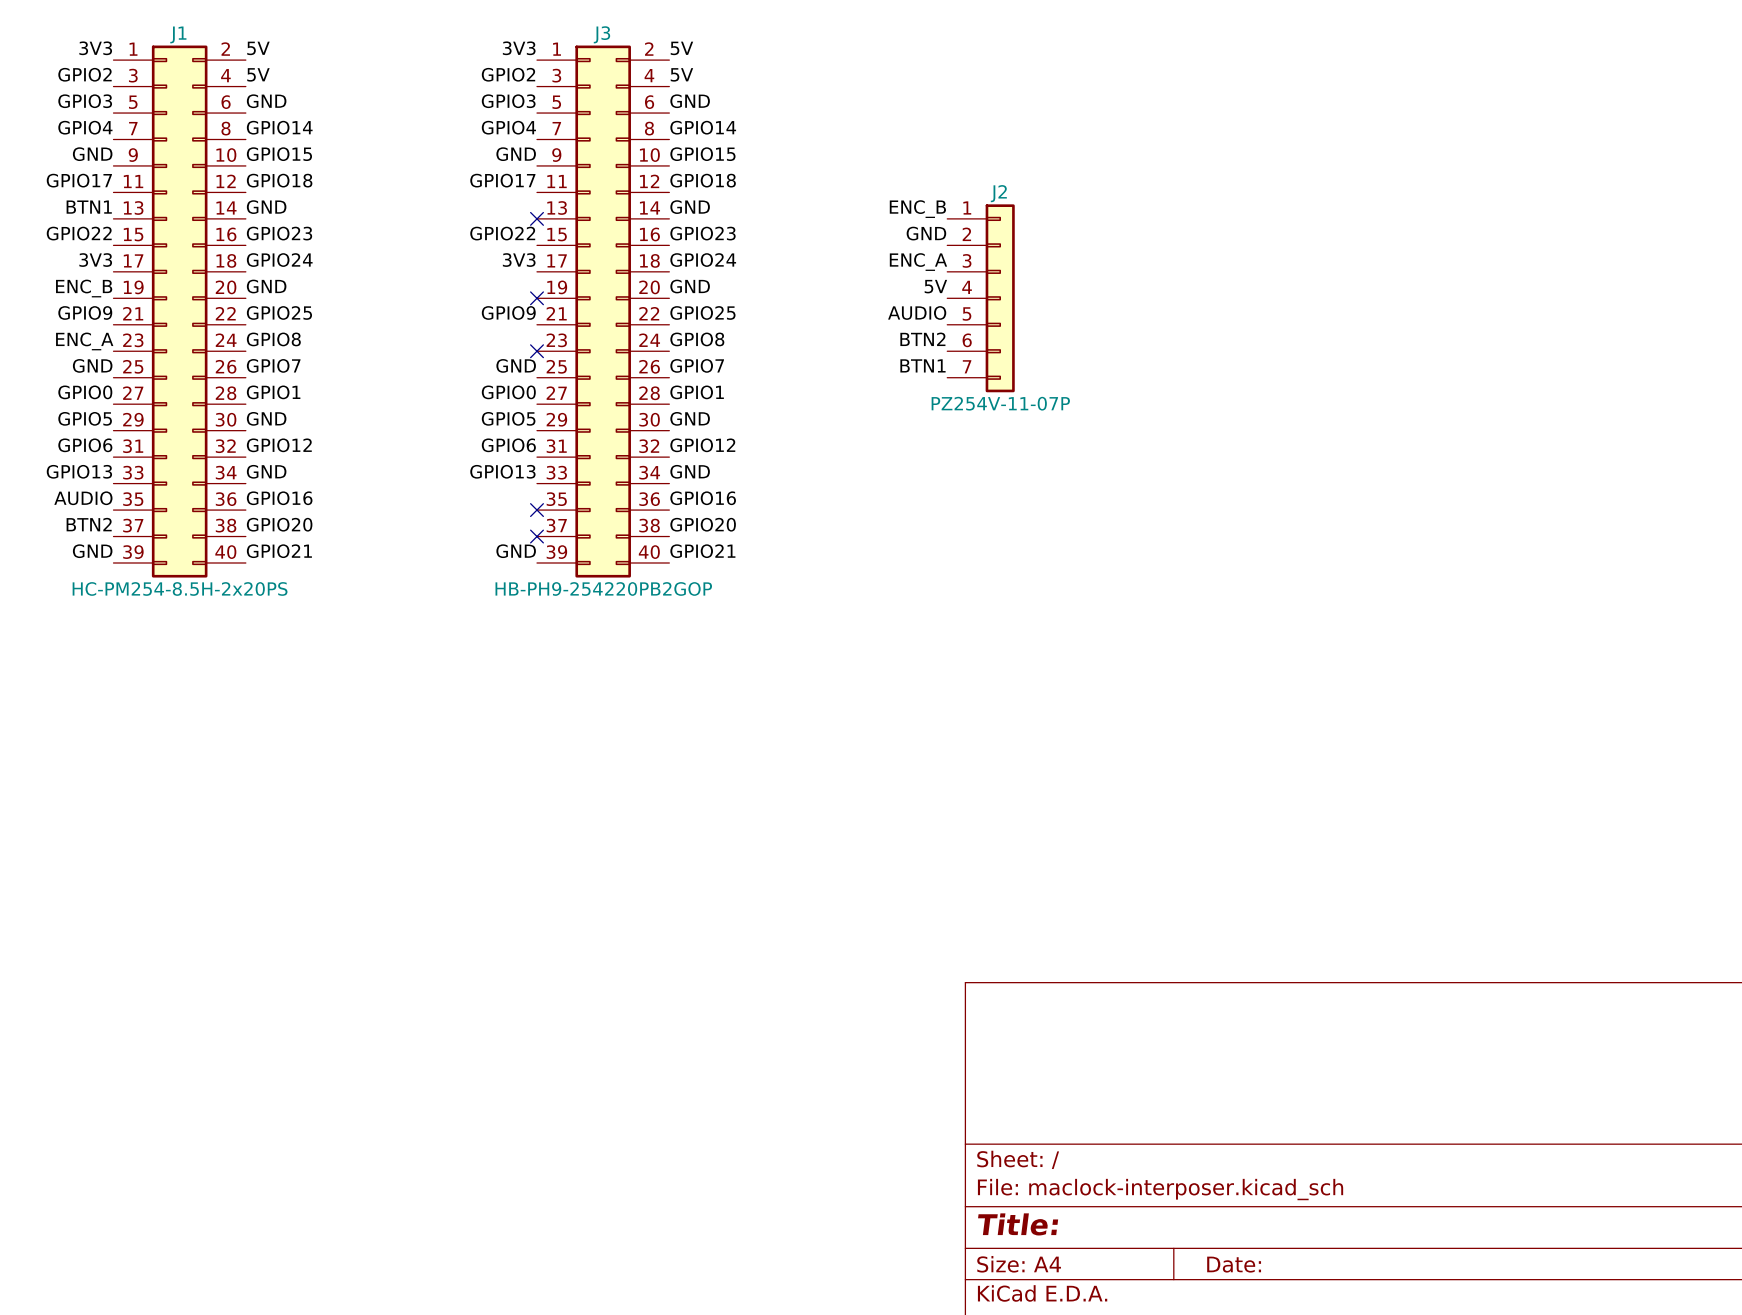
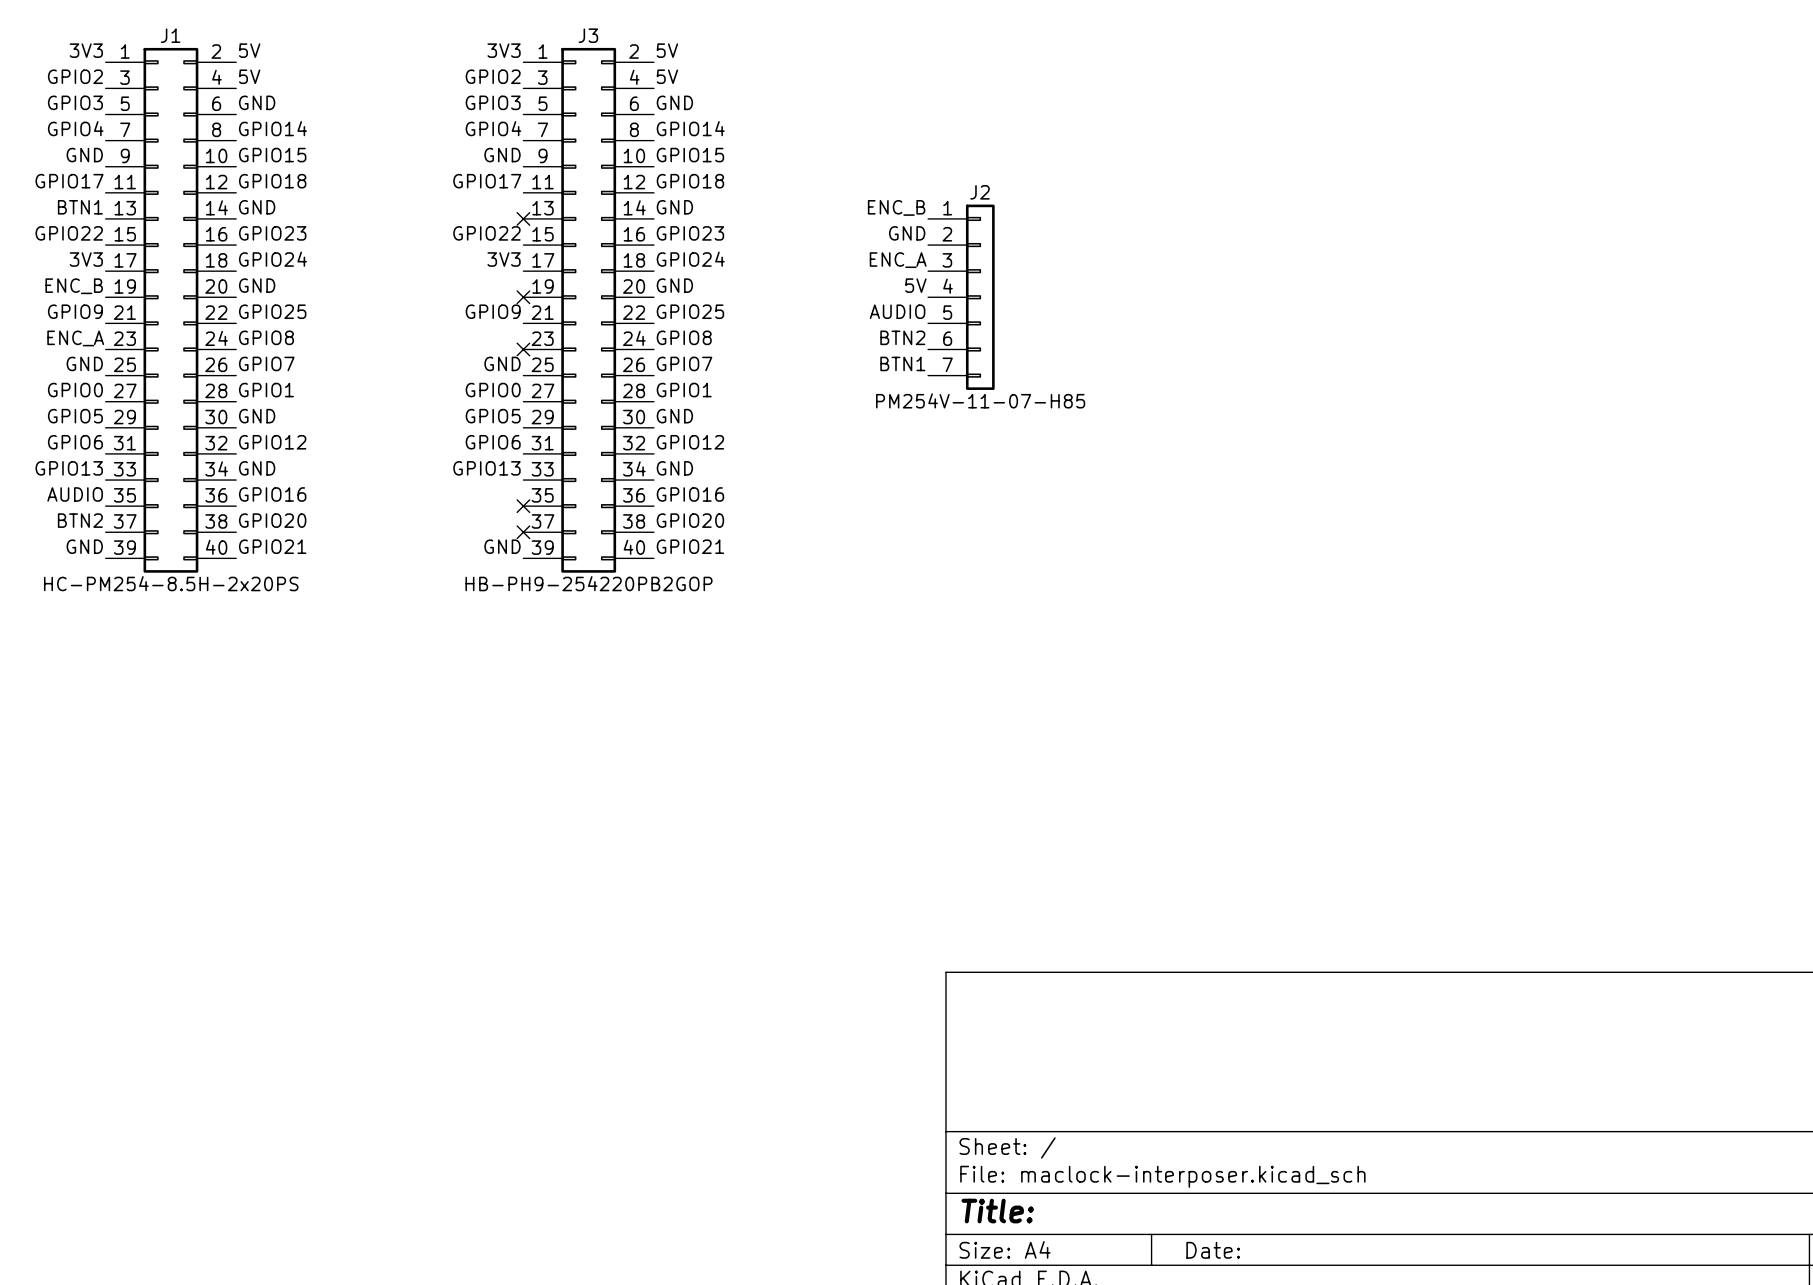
J2 value: PZ254V-11-07P (1000, 403) -> PM254V-11-07-H85 (980, 400)

